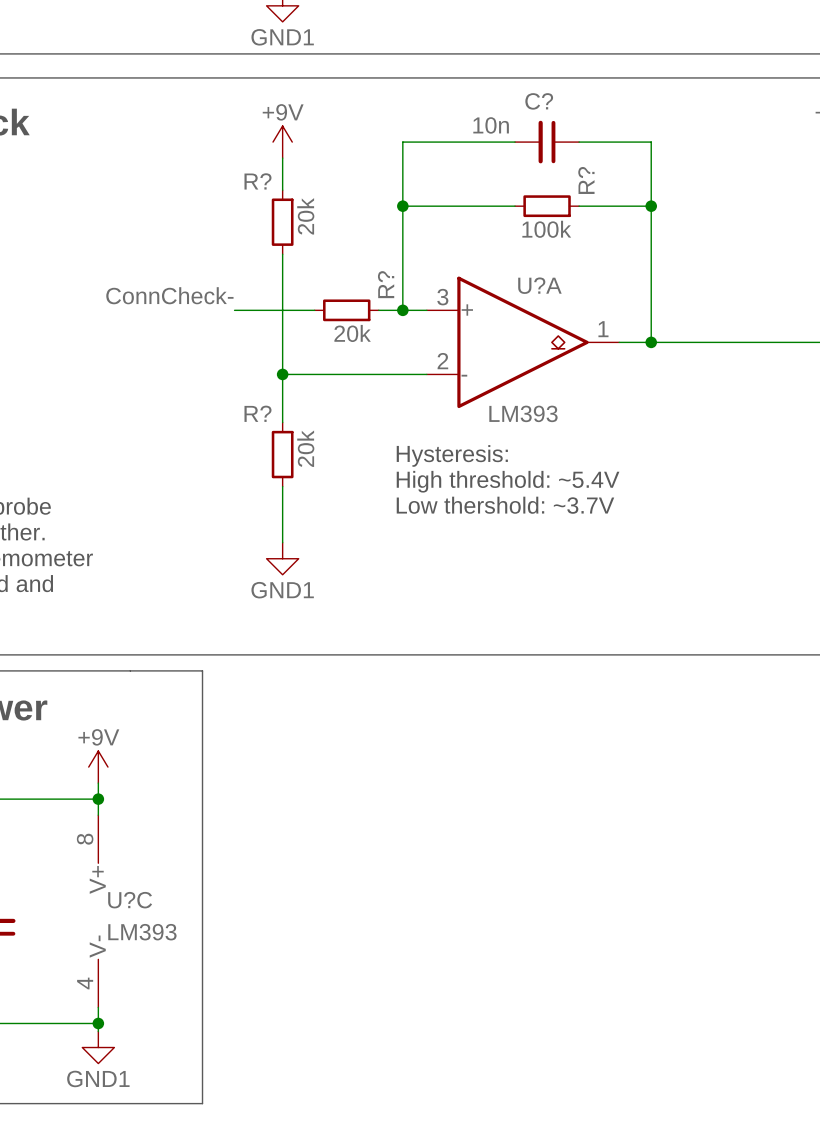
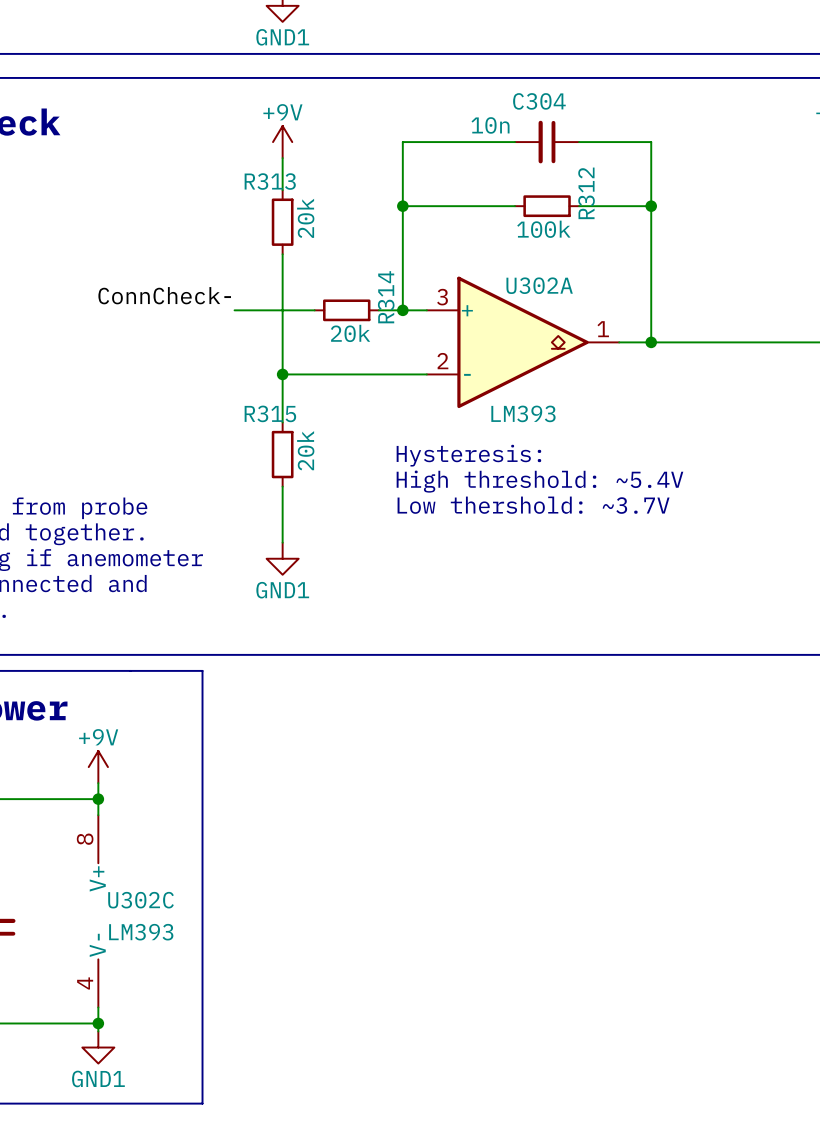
C? name: C? (539, 101) -> C304 (539, 101)
R? name: R? (586, 180) -> R312 (586, 193)
R? name: R? (257, 181) -> R313 (270, 181)
R? name: R? (386, 284) -> R314 (386, 297)
U?A name: U?A (539, 285) -> U302A (539, 285)
R? name: R? (257, 413) -> R315 (270, 413)
U?C name: U?C (130, 900) -> U302C (141, 900)

